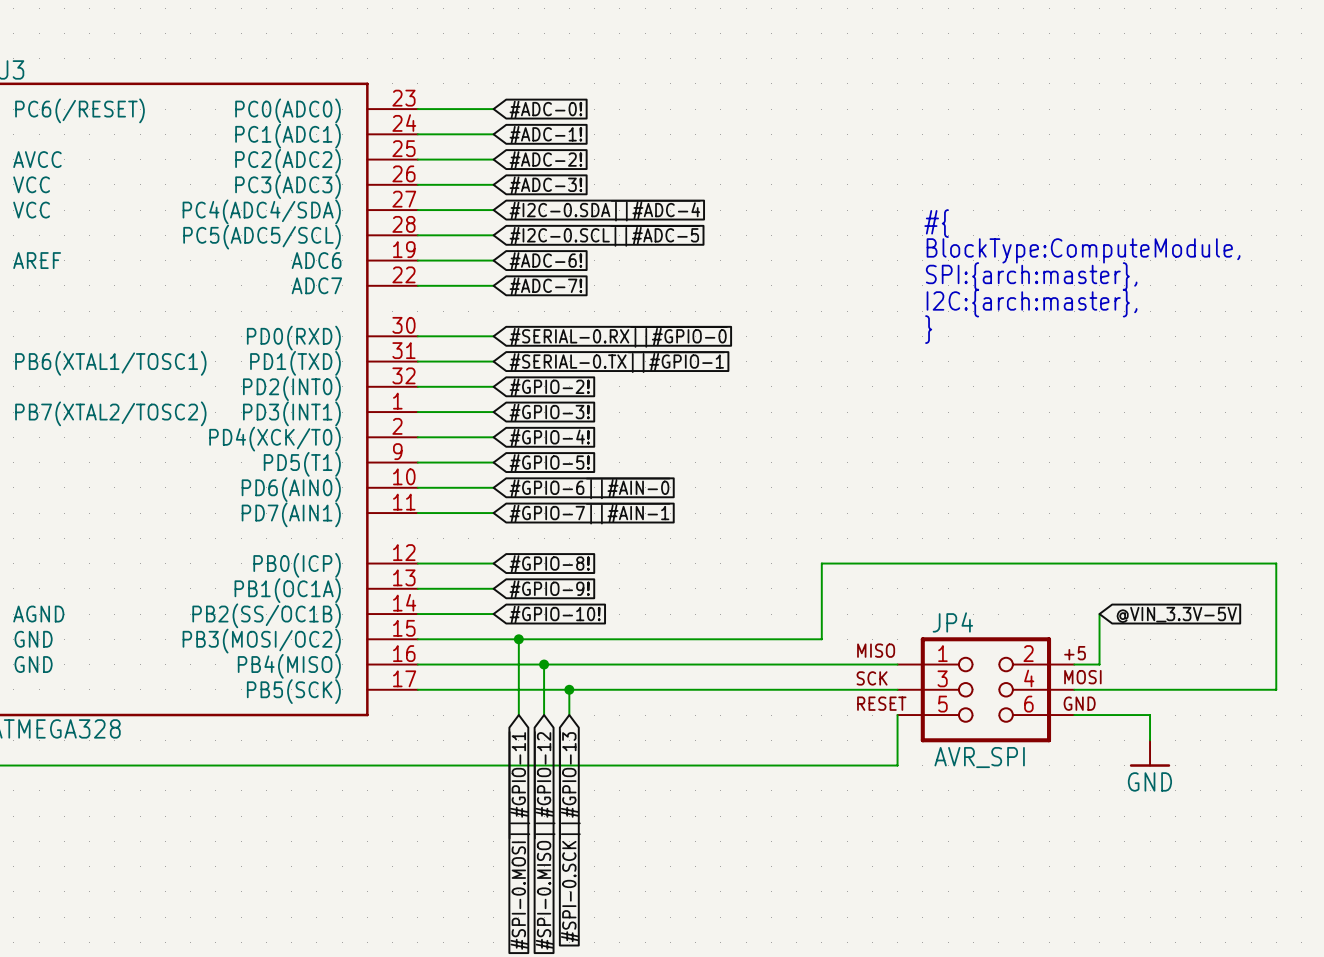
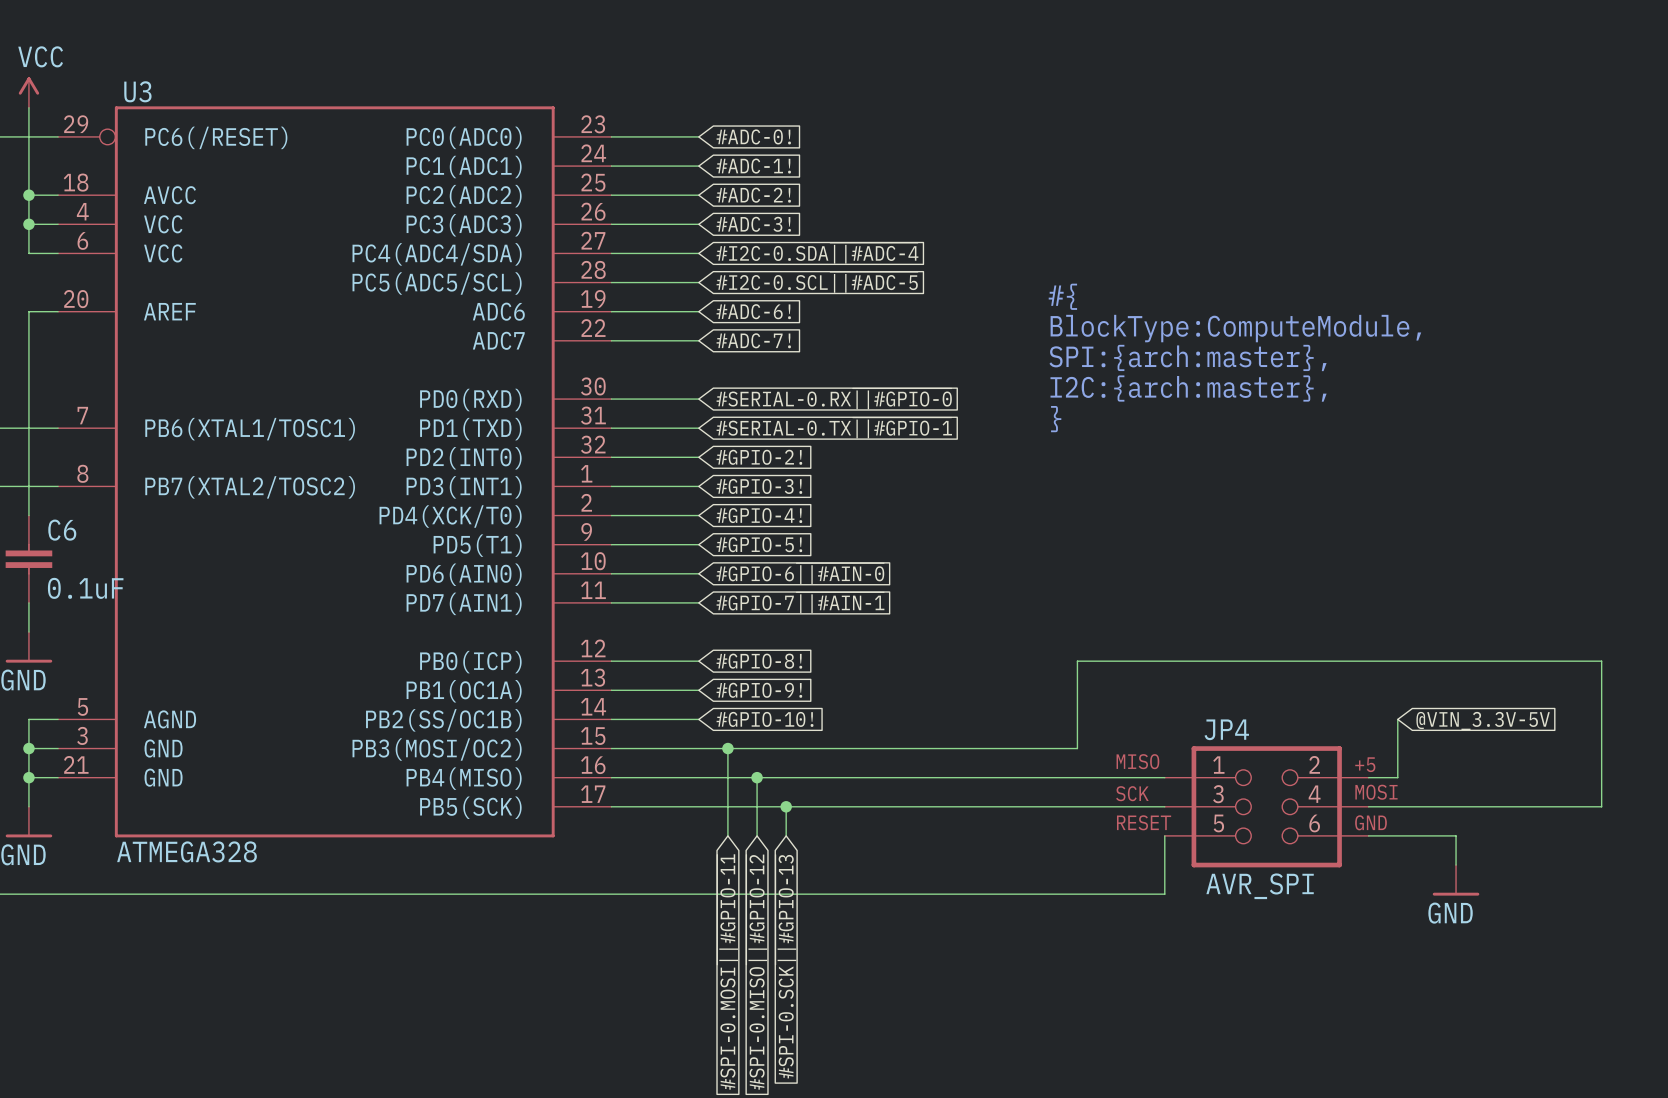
text position: #{ (936, 223) -> #{ (1062, 296)
text position: BlockType:ComputeModule, (1083, 250) -> BlockType:ComputeModule, (1235, 328)
text position: SPI:{arch:master}, (1031, 276) -> SPI:{arch:master}, (1188, 357)
text position: I2C:{arch:master}, (1032, 303) -> I2C:{arch:master}, (1188, 388)
text position: } (928, 329) -> } (1056, 419)

